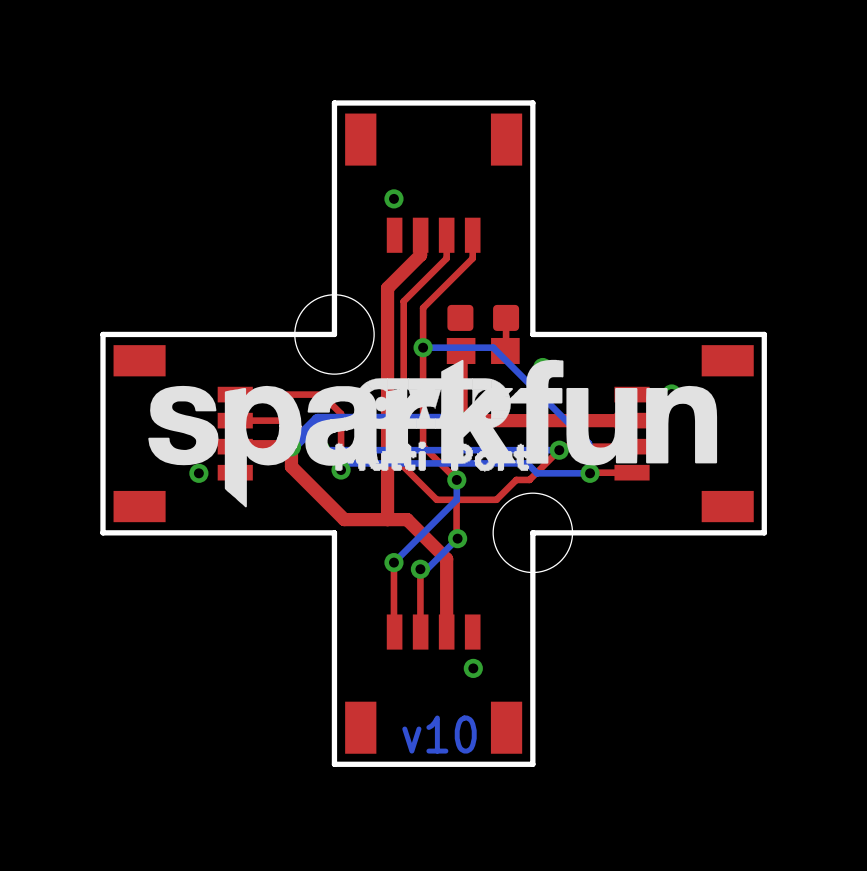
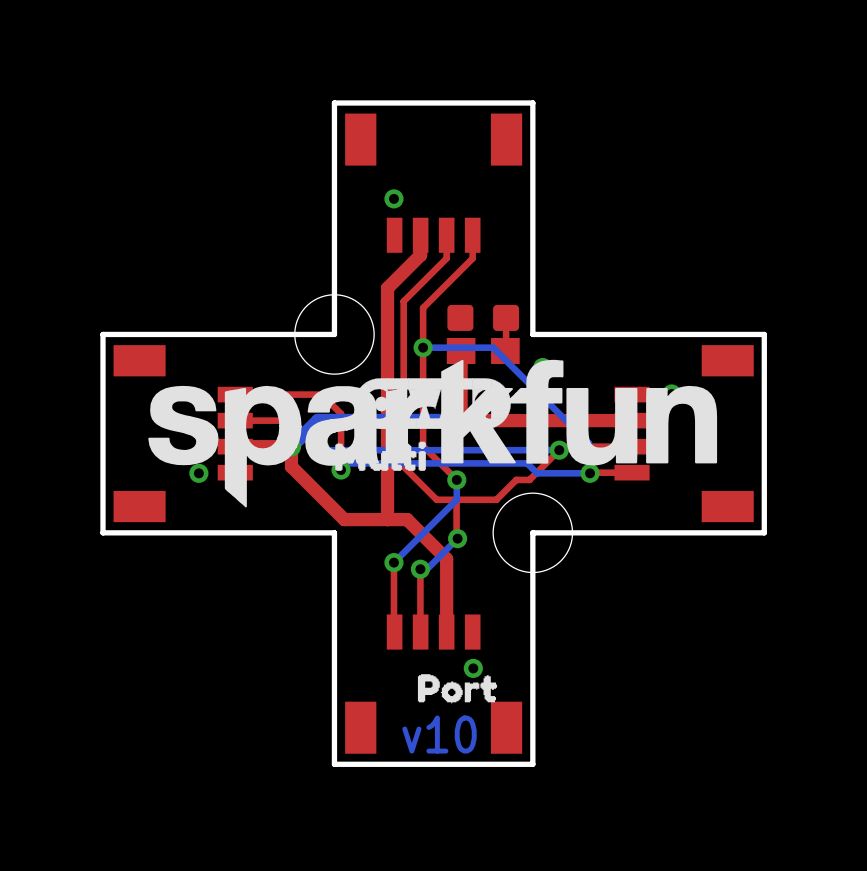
drawing position: (490, 457) -> (457, 688)

